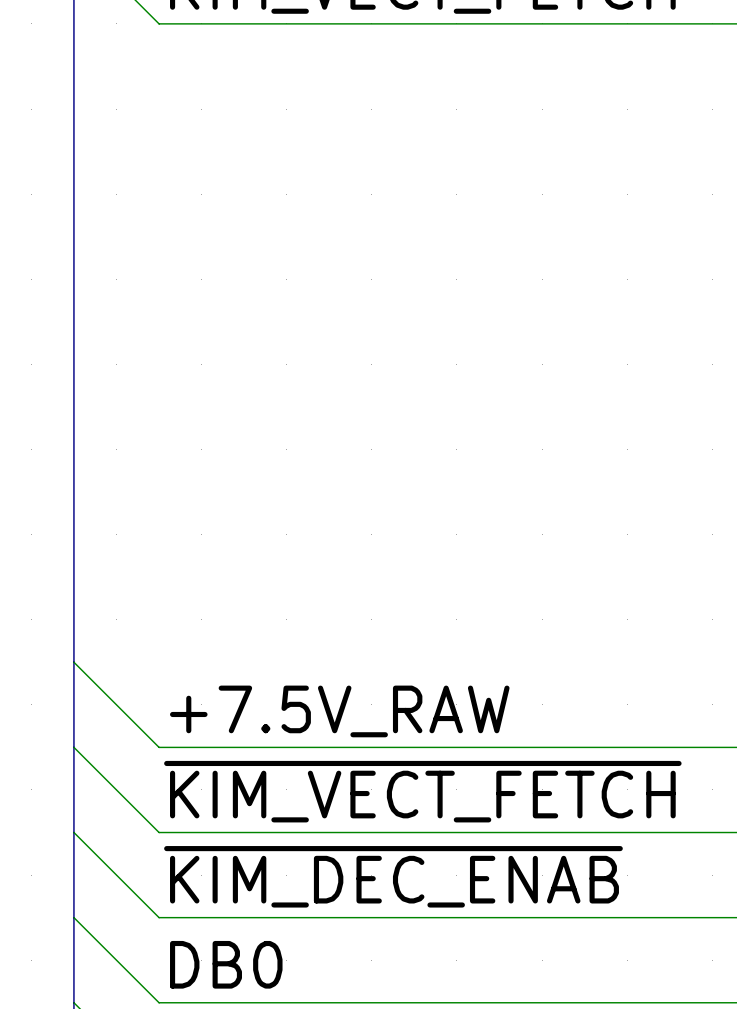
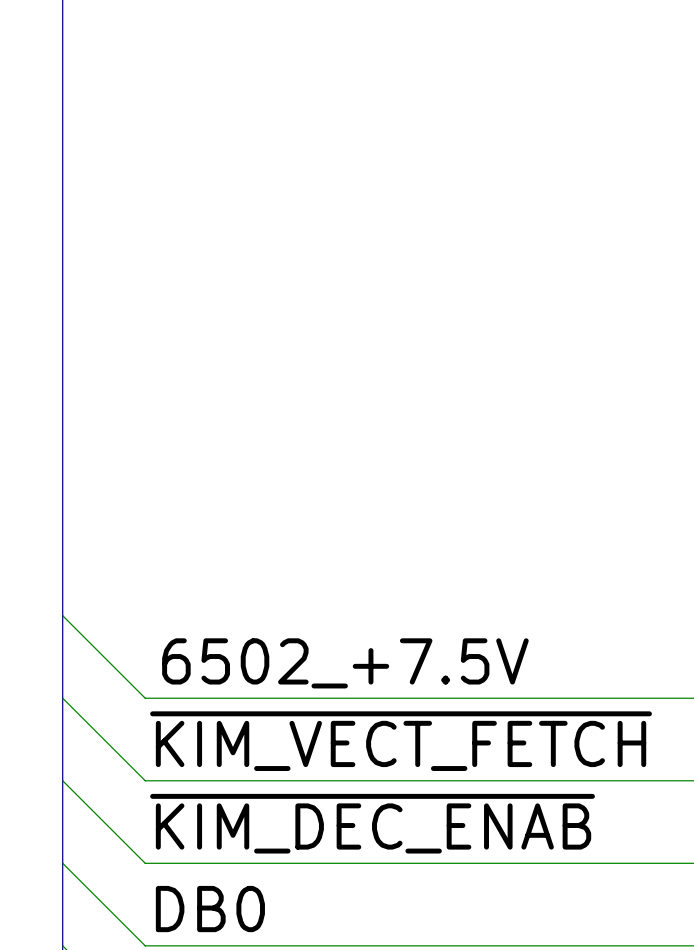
label: +7.5V_RAW (339, 711) -> 6502_+7.5V (345, 663)

